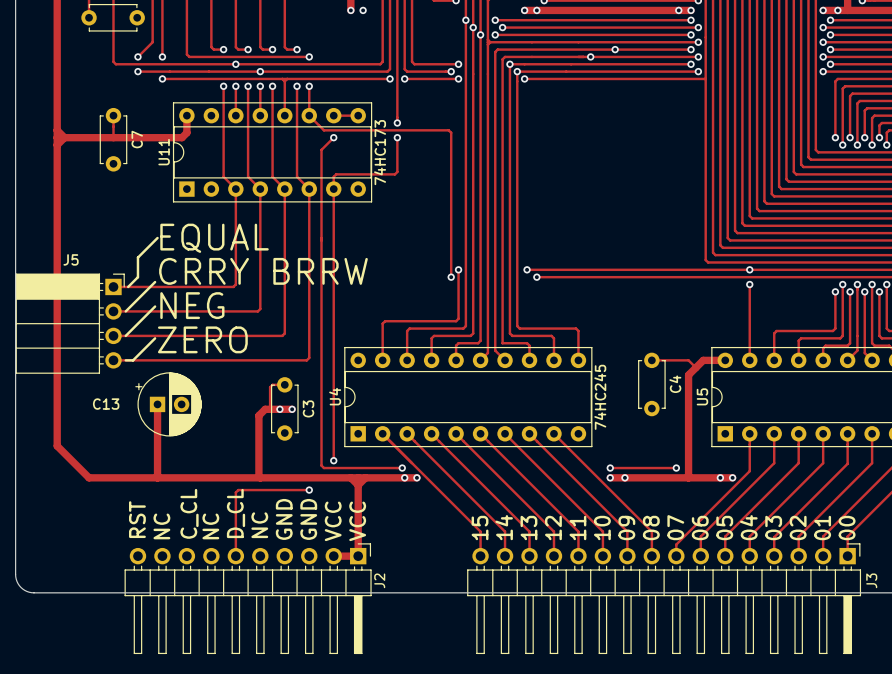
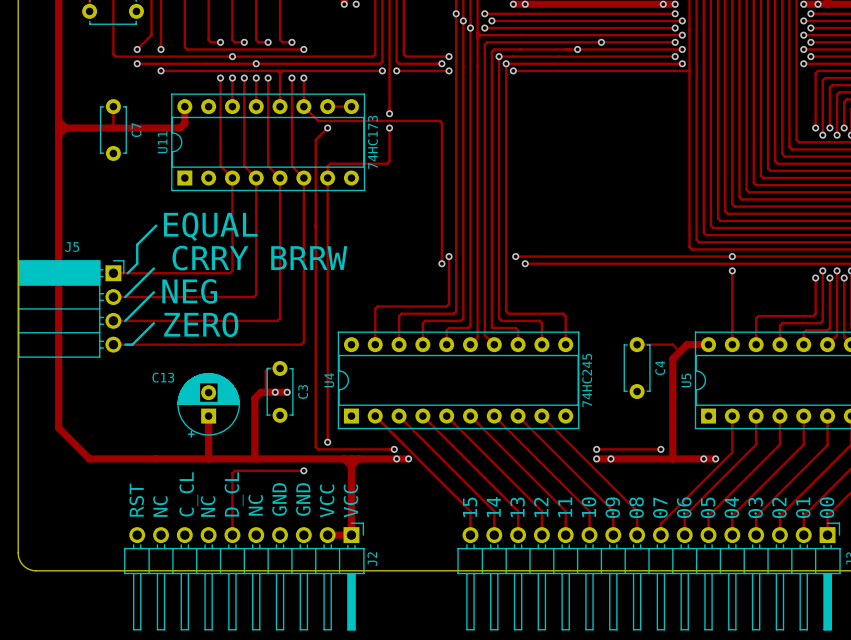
C13 name position: C13 (106, 404) -> C13 (163, 377)
track: (157, 404) (157, 477) -> none
C13 rotation: 0° (168, 404) -> 90° counterclockwise (208, 405)
C13 position: (168, 404) -> (208, 405)
track: none -> (208, 416) (208, 458)

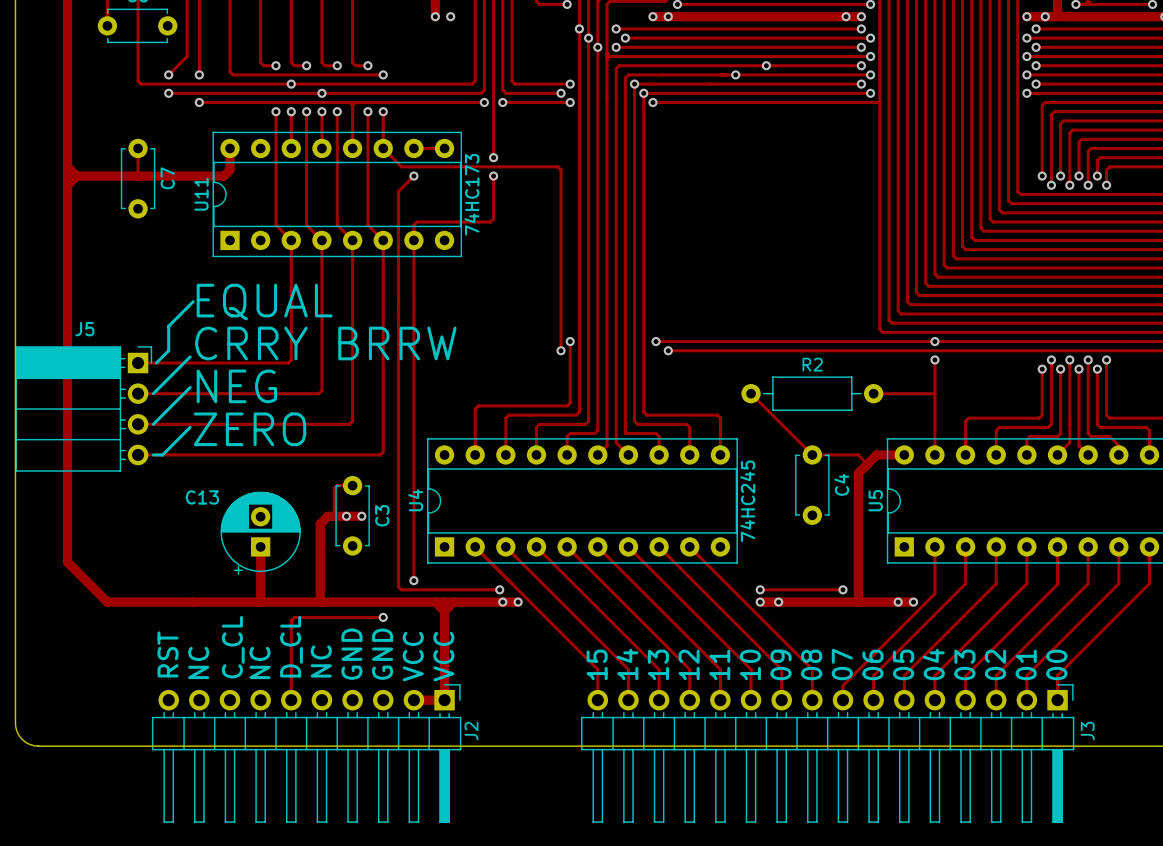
track: none -> (751, 393) (812, 454)
R2: none -> (812, 393)
track: none -> (873, 393) (934, 393)

